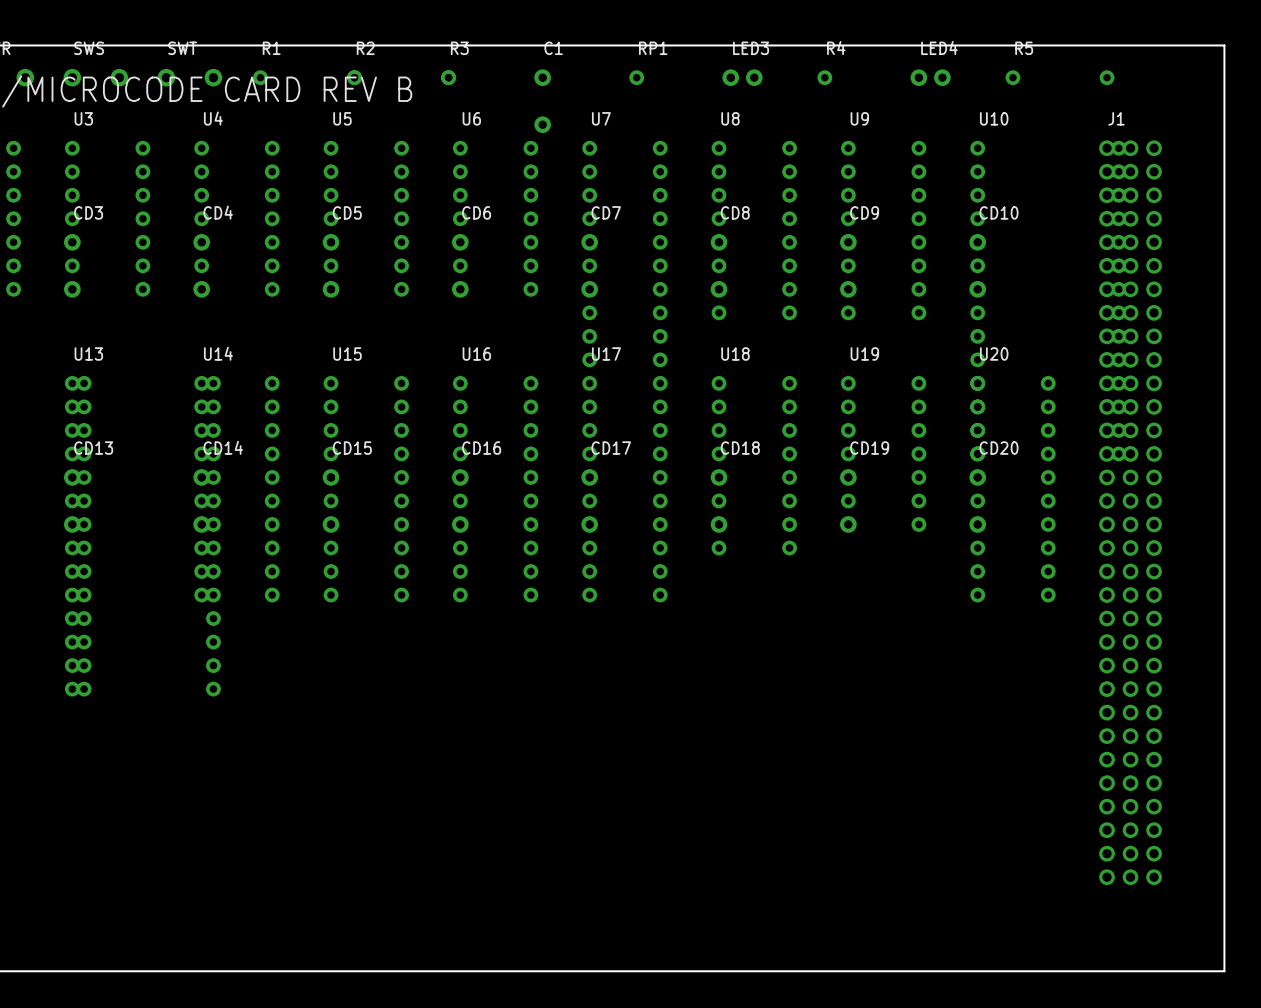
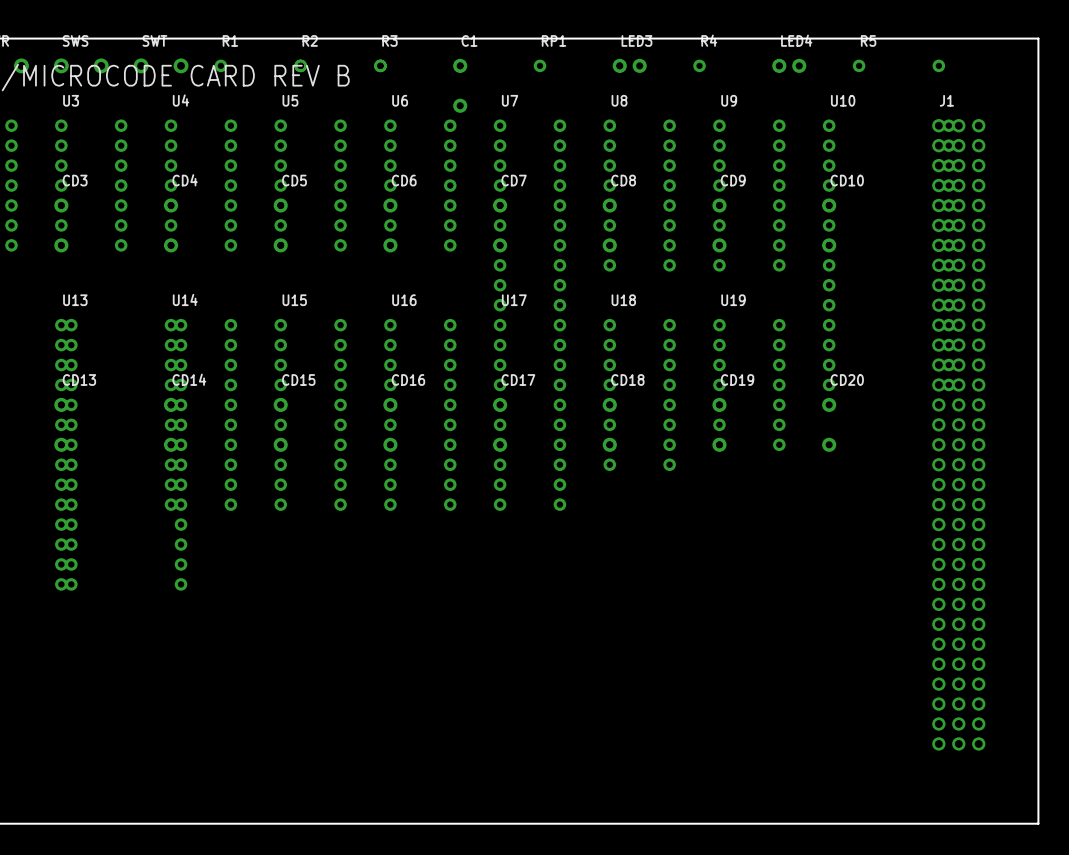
U20: (1012, 489) -> none

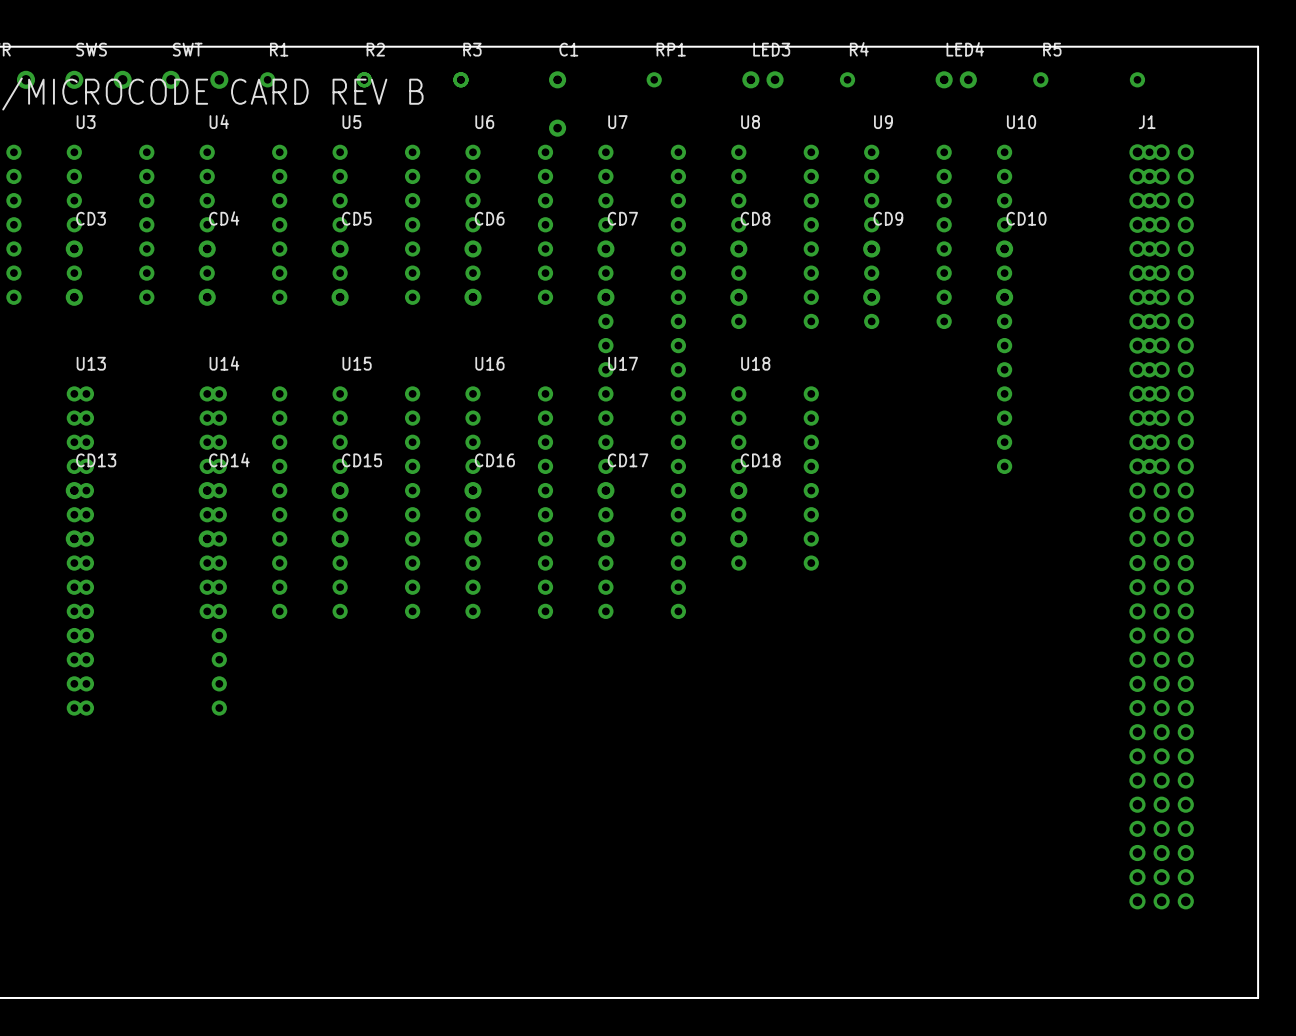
U19: (749, 384) -> none
CD19: (719, 424) -> none
CD20: (829, 424) -> none

